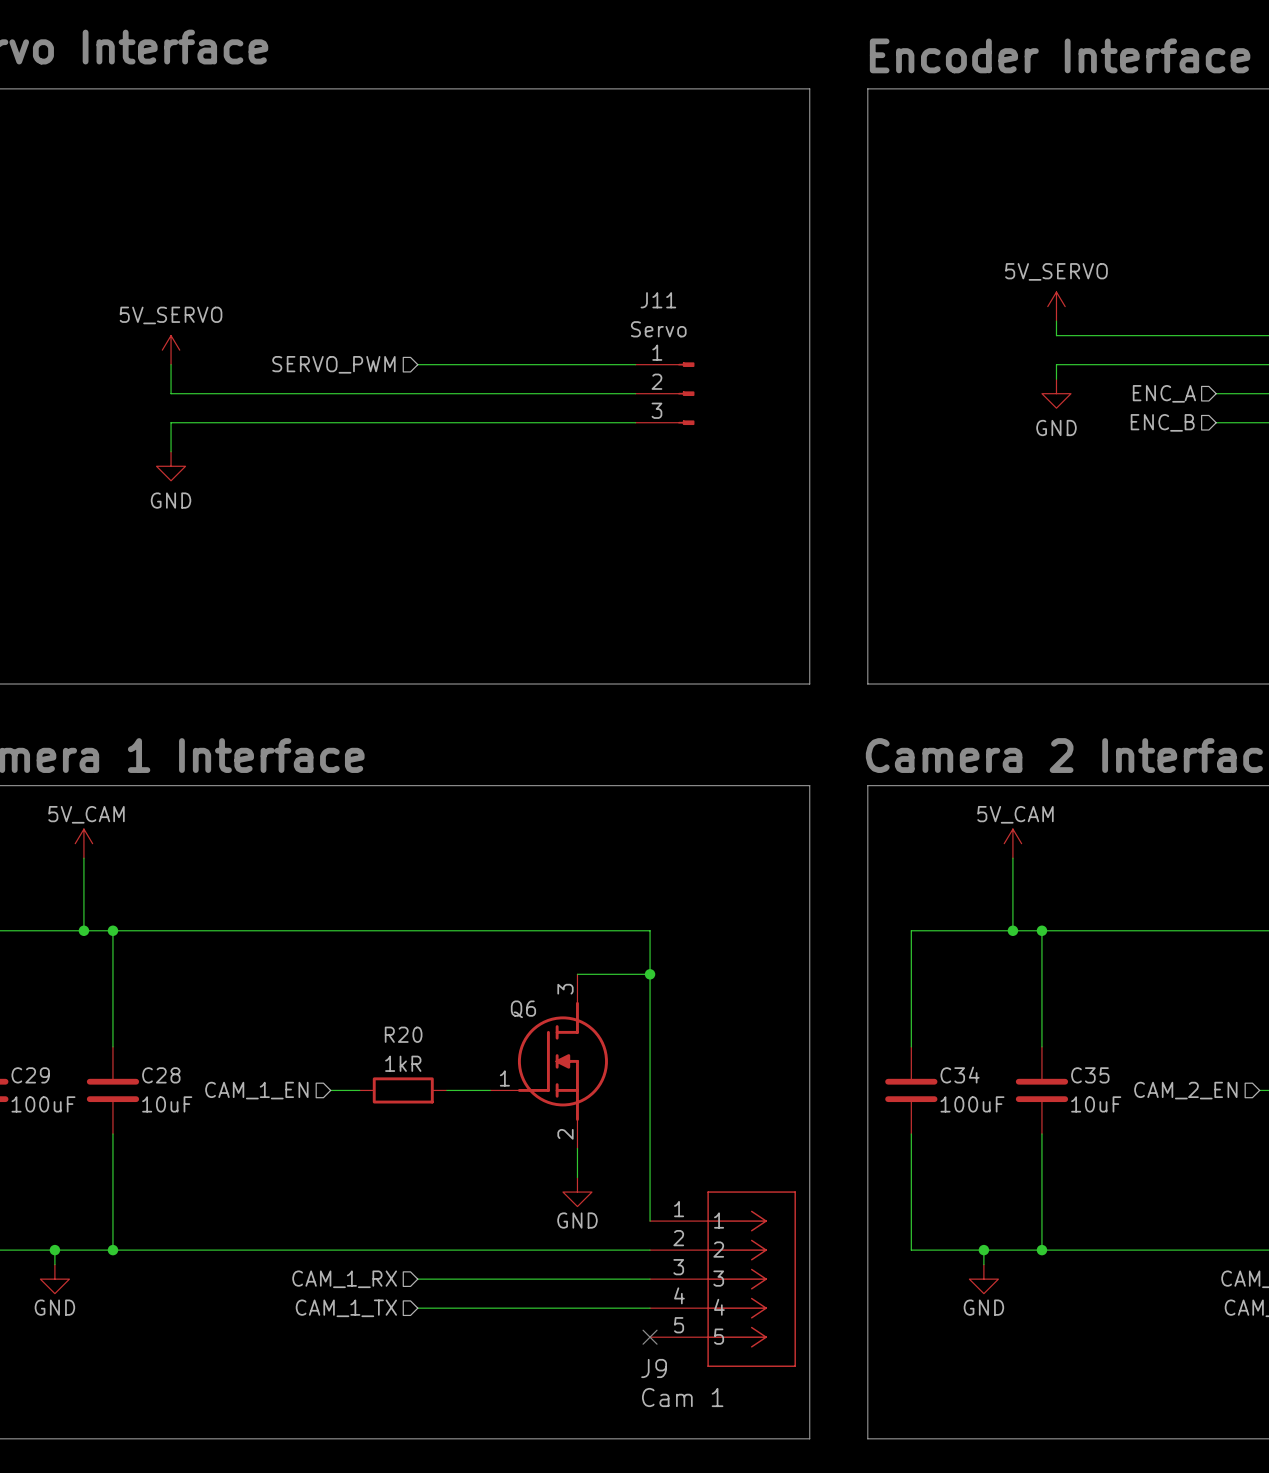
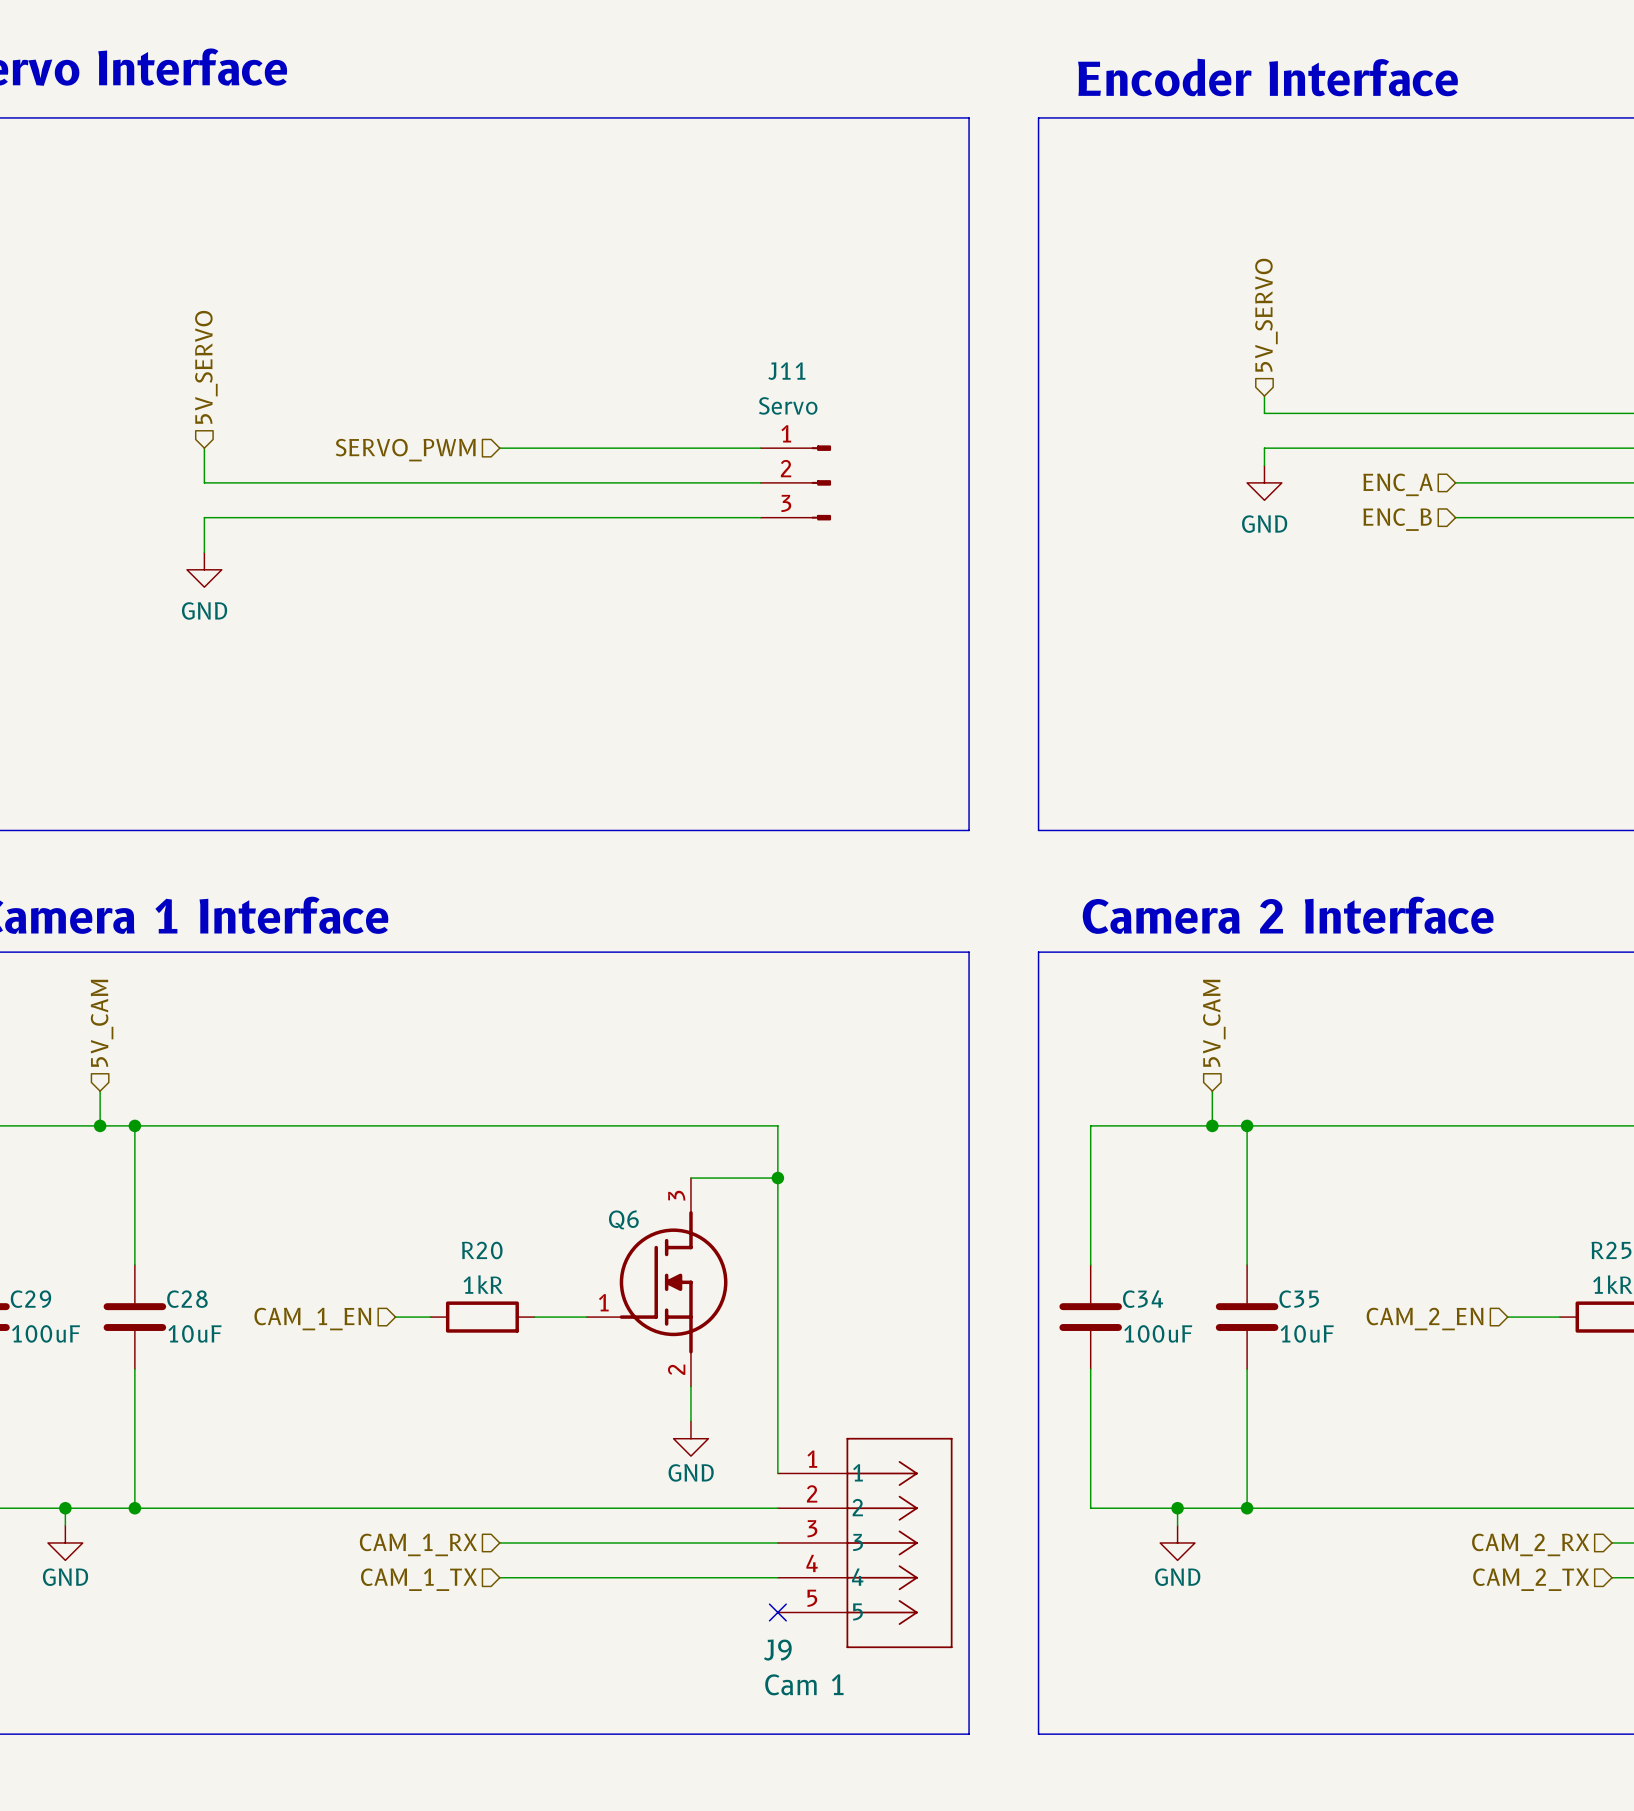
hierarchical label: none -> 5V_SERVO (1266, 315)
hierarchical label: none -> 5V_SERVO (206, 367)
power symbol: 5V_SERVO (1056, 306) -> none
power symbol: 5V_SERVO (171, 350) -> none
hierarchical label: none -> 5V_CAM (102, 1023)
hierarchical label: none -> 5V_CAM (1214, 1023)
power symbol: 5V_CAM (83, 843) -> none
power symbol: 5V_CAM (1012, 843) -> none
wire: (83, 858) (83, 901) -> none
wire: (1012, 858) (1012, 901) -> none

